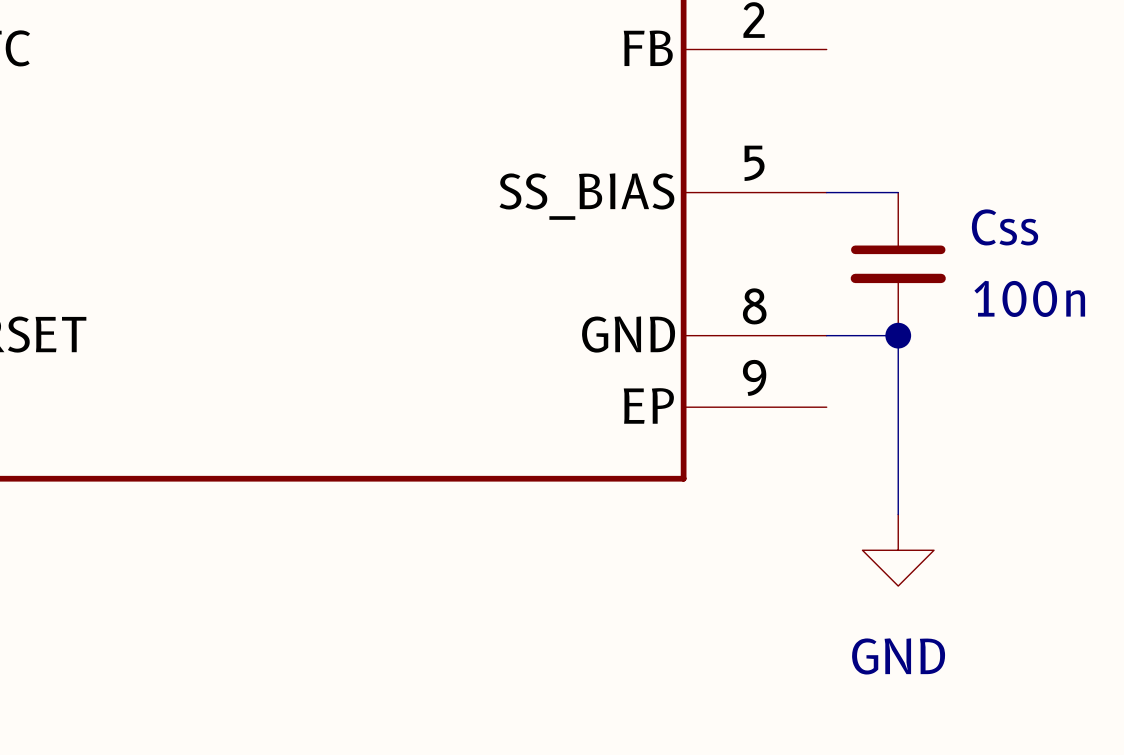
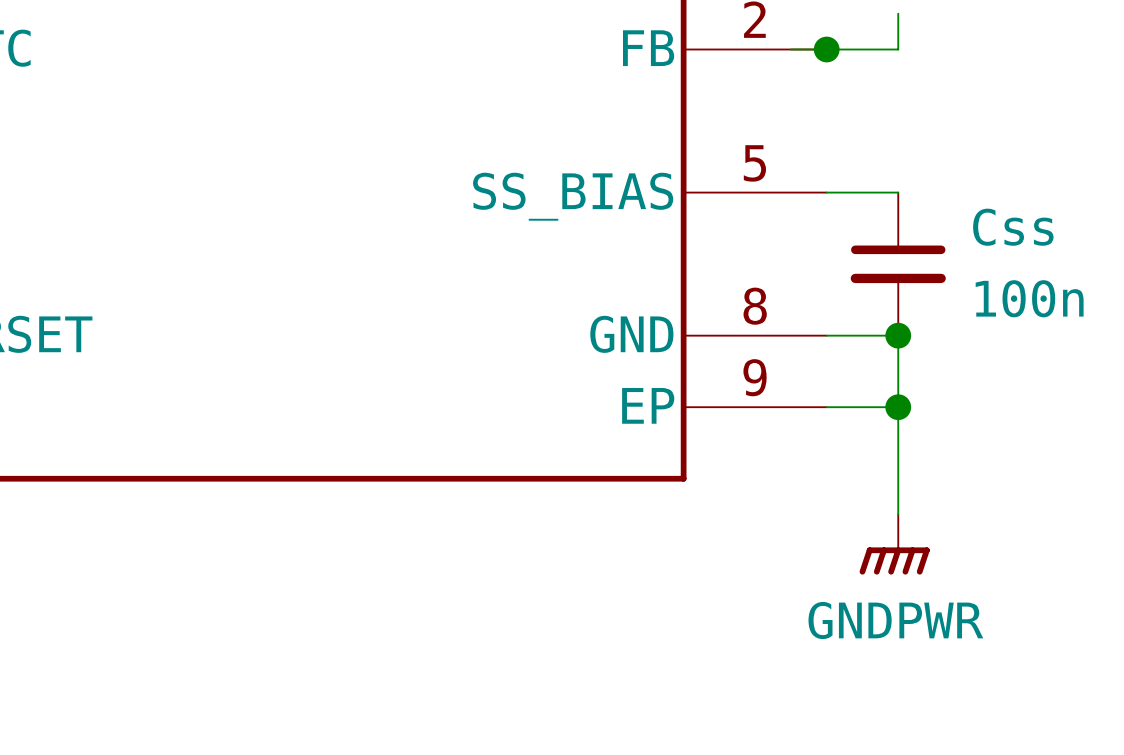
wire: none -> (898, 13) (898, 49) (790, 49)
junction: none -> (826, 49)
wire: none -> (826, 407) (898, 407)
junction: none -> (898, 407)
power symbol: GND (898, 550) -> GNDPWR (894, 544)

